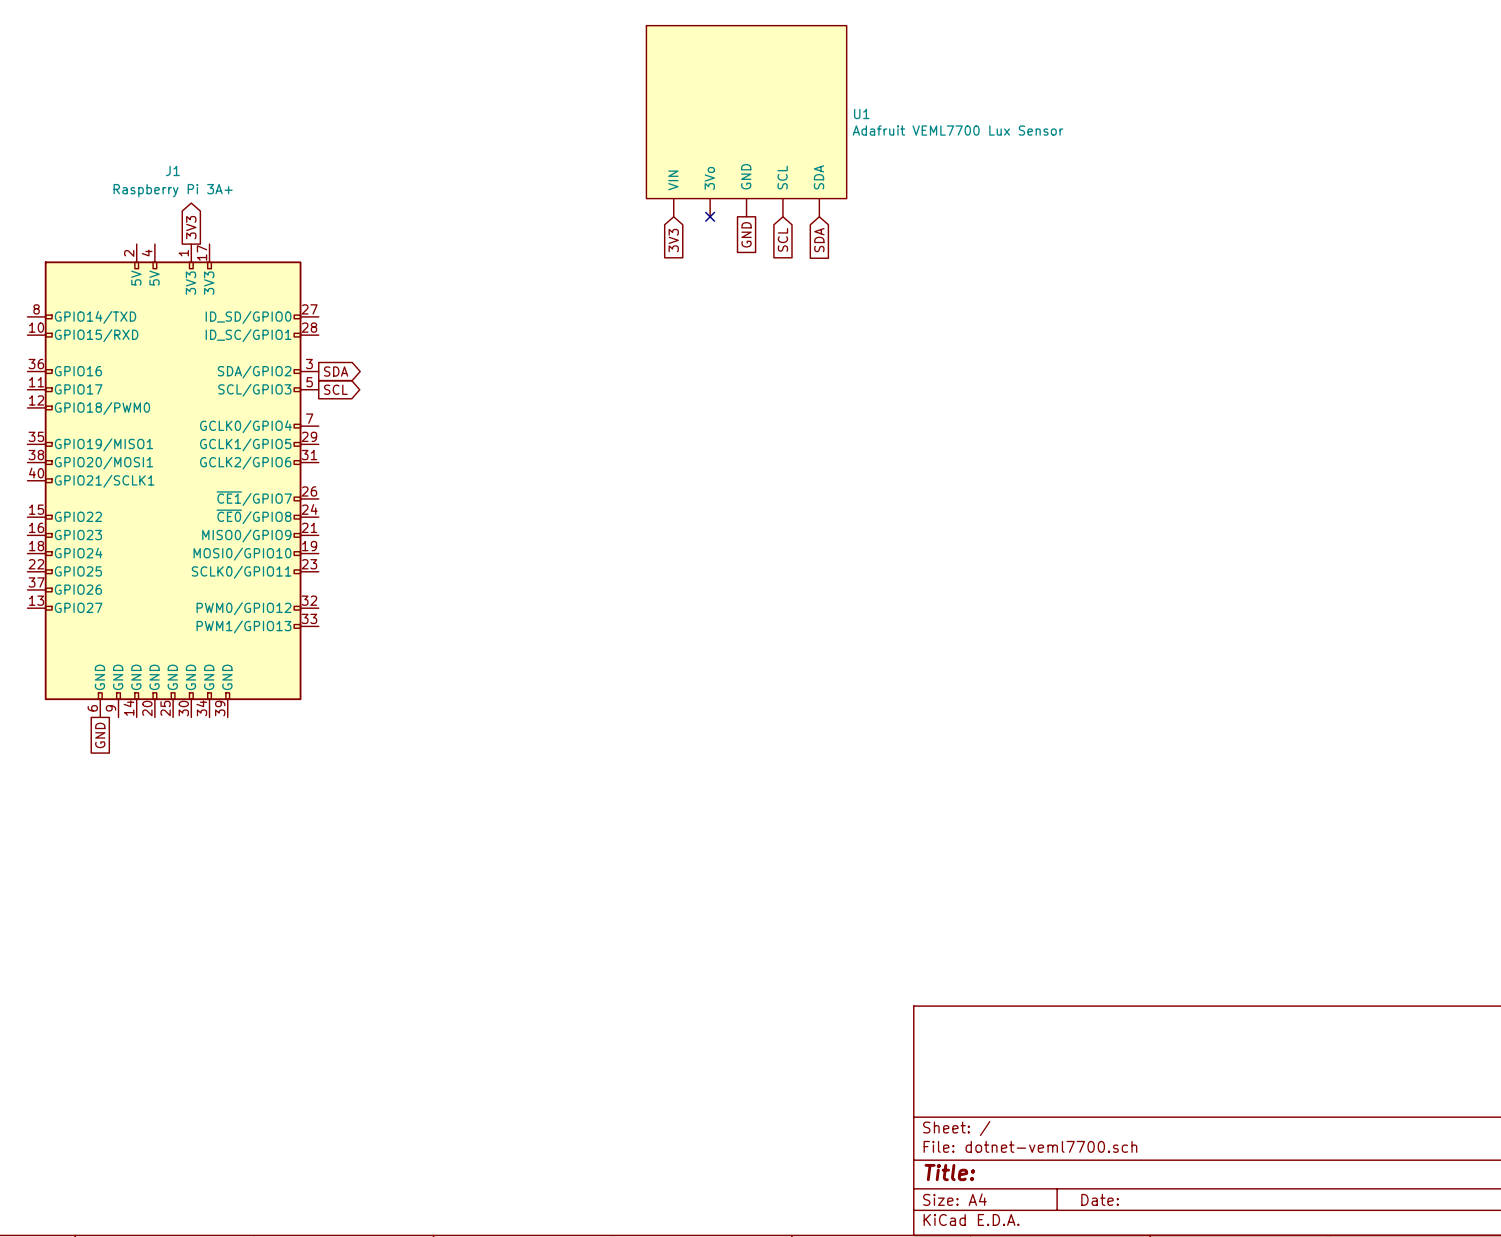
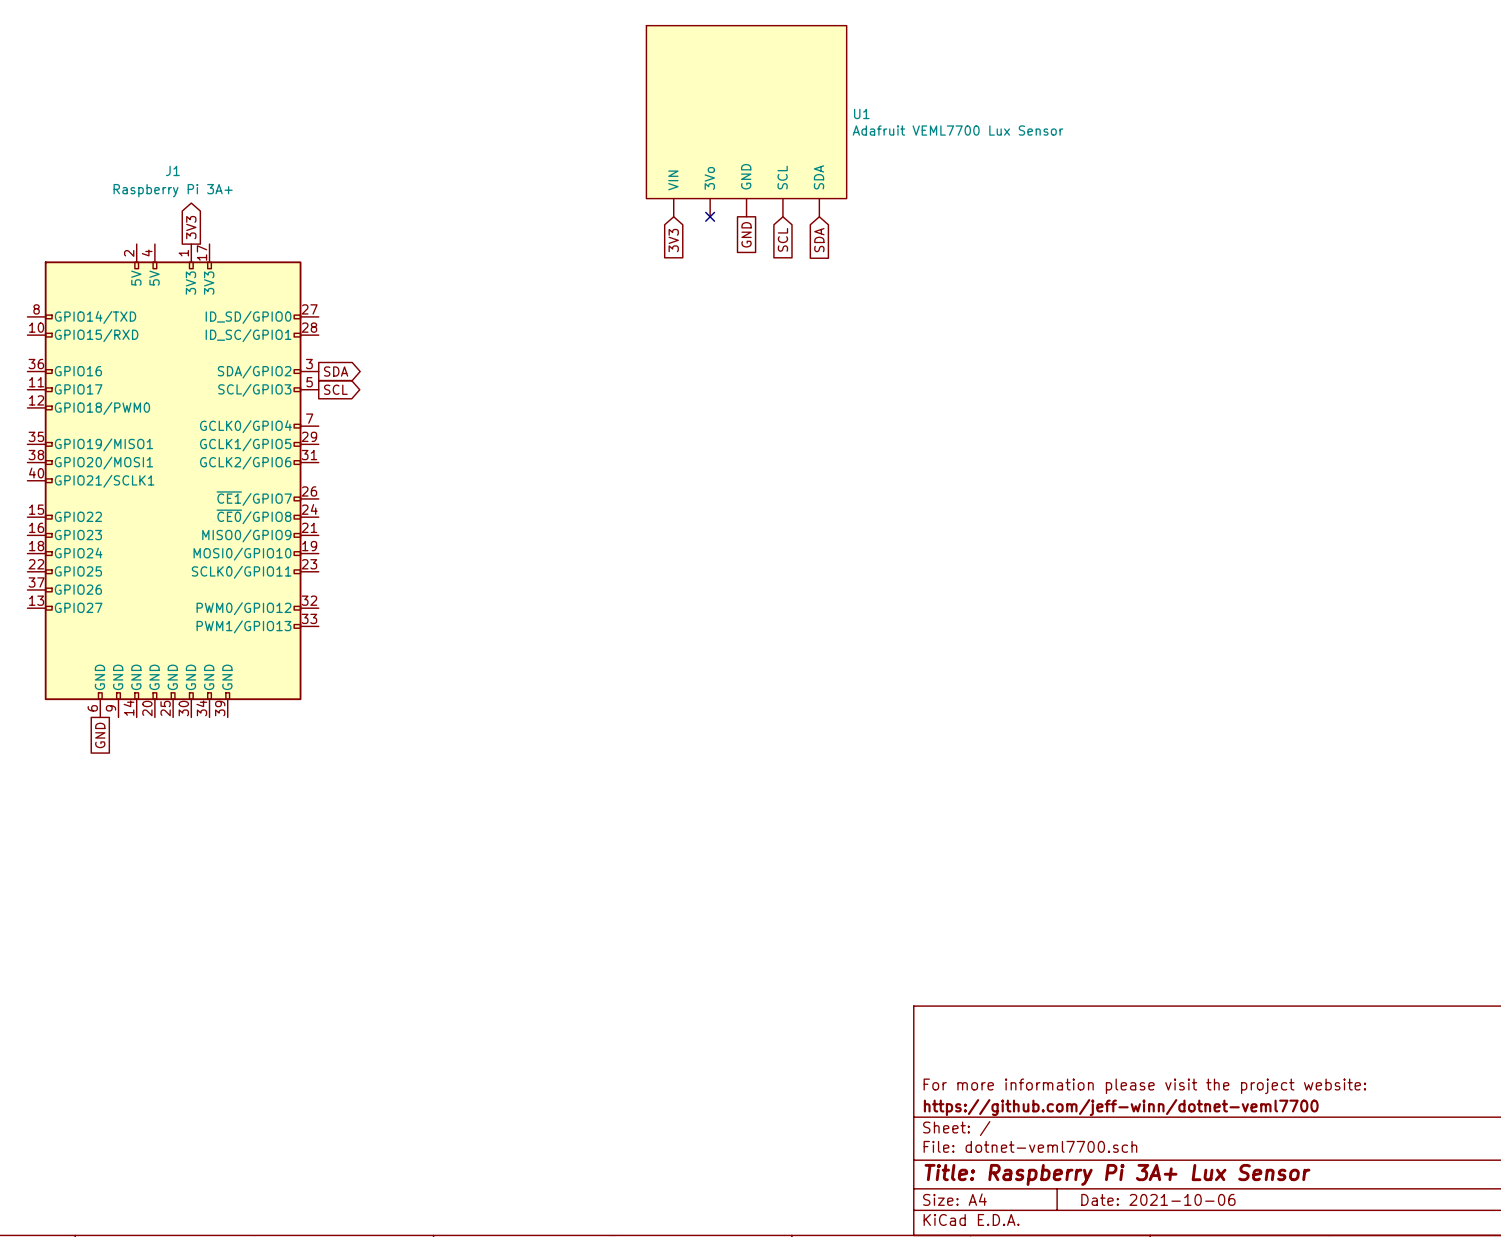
title block: none -> For more information please visit the project website: (1144, 1086)
title block: none -> https://github.com/jeff-winn/dotnet-veml7700 (1121, 1107)
title block: Title: (949, 1172) -> Title: Raspberry Pi 3A+ Lux Sensor (1117, 1174)
title block: Date: (1100, 1199) -> Date: 2021-10-06 (1158, 1199)

